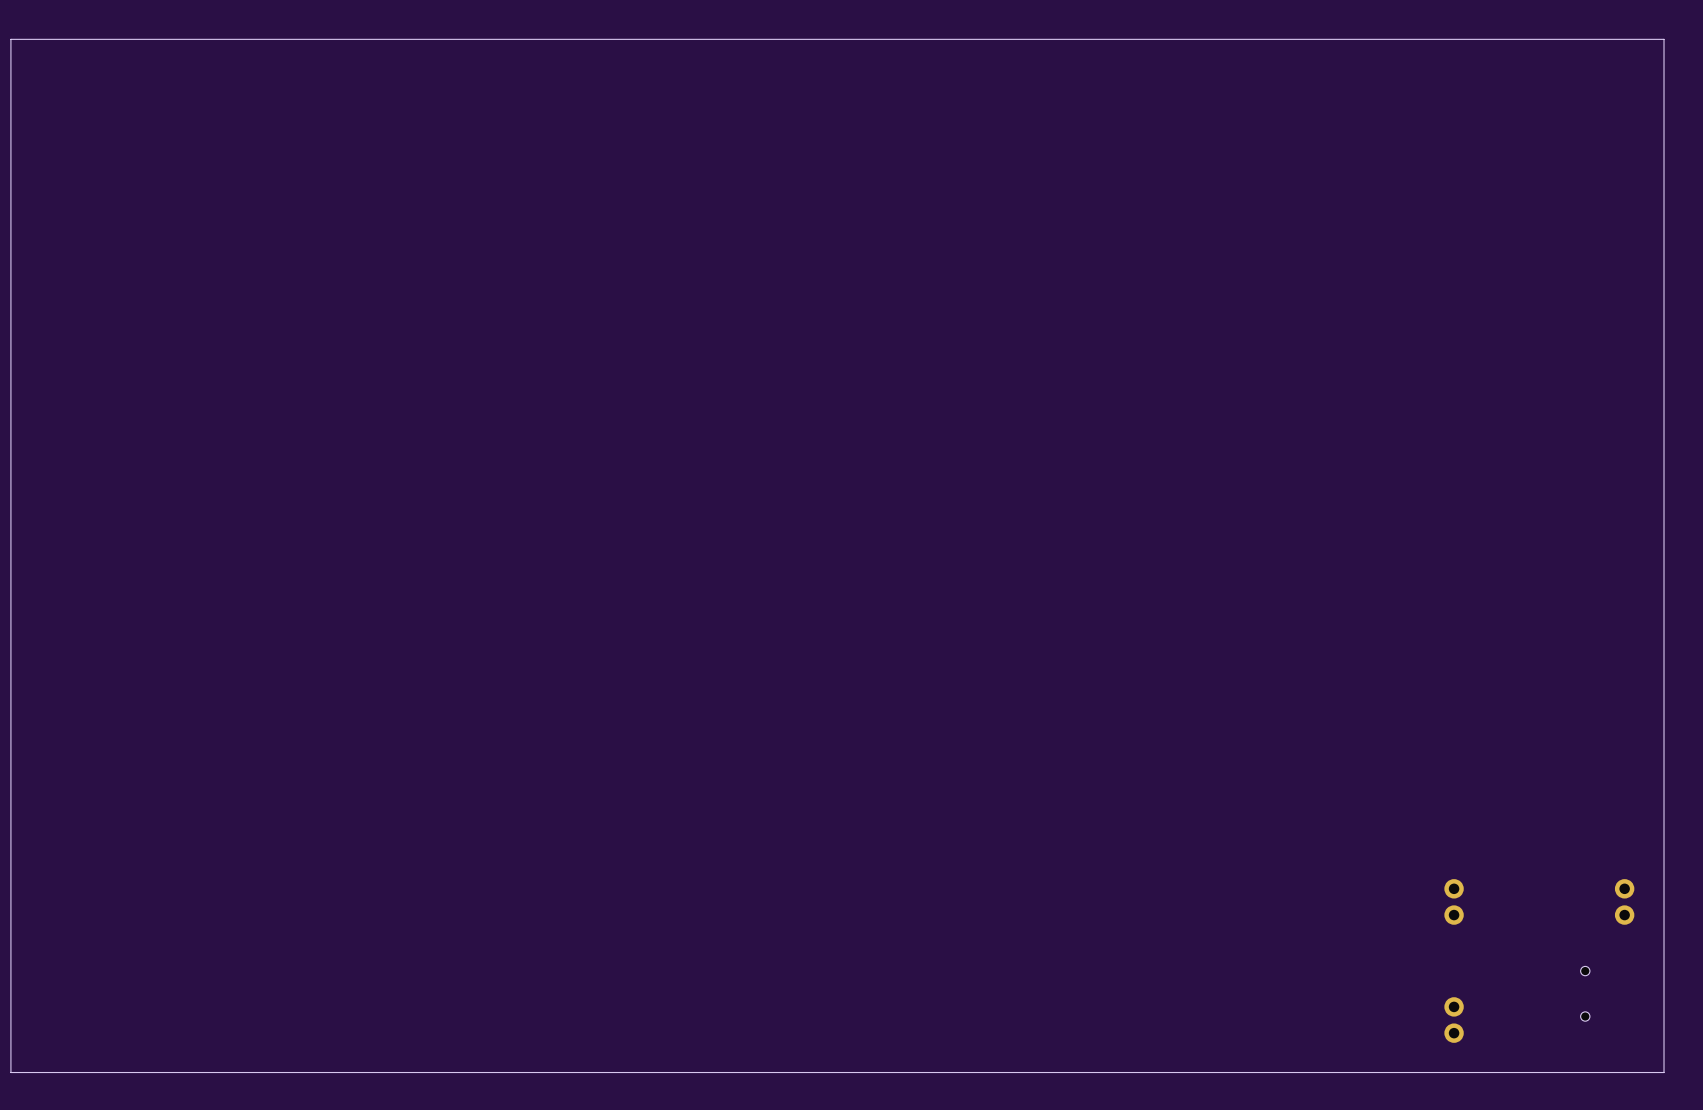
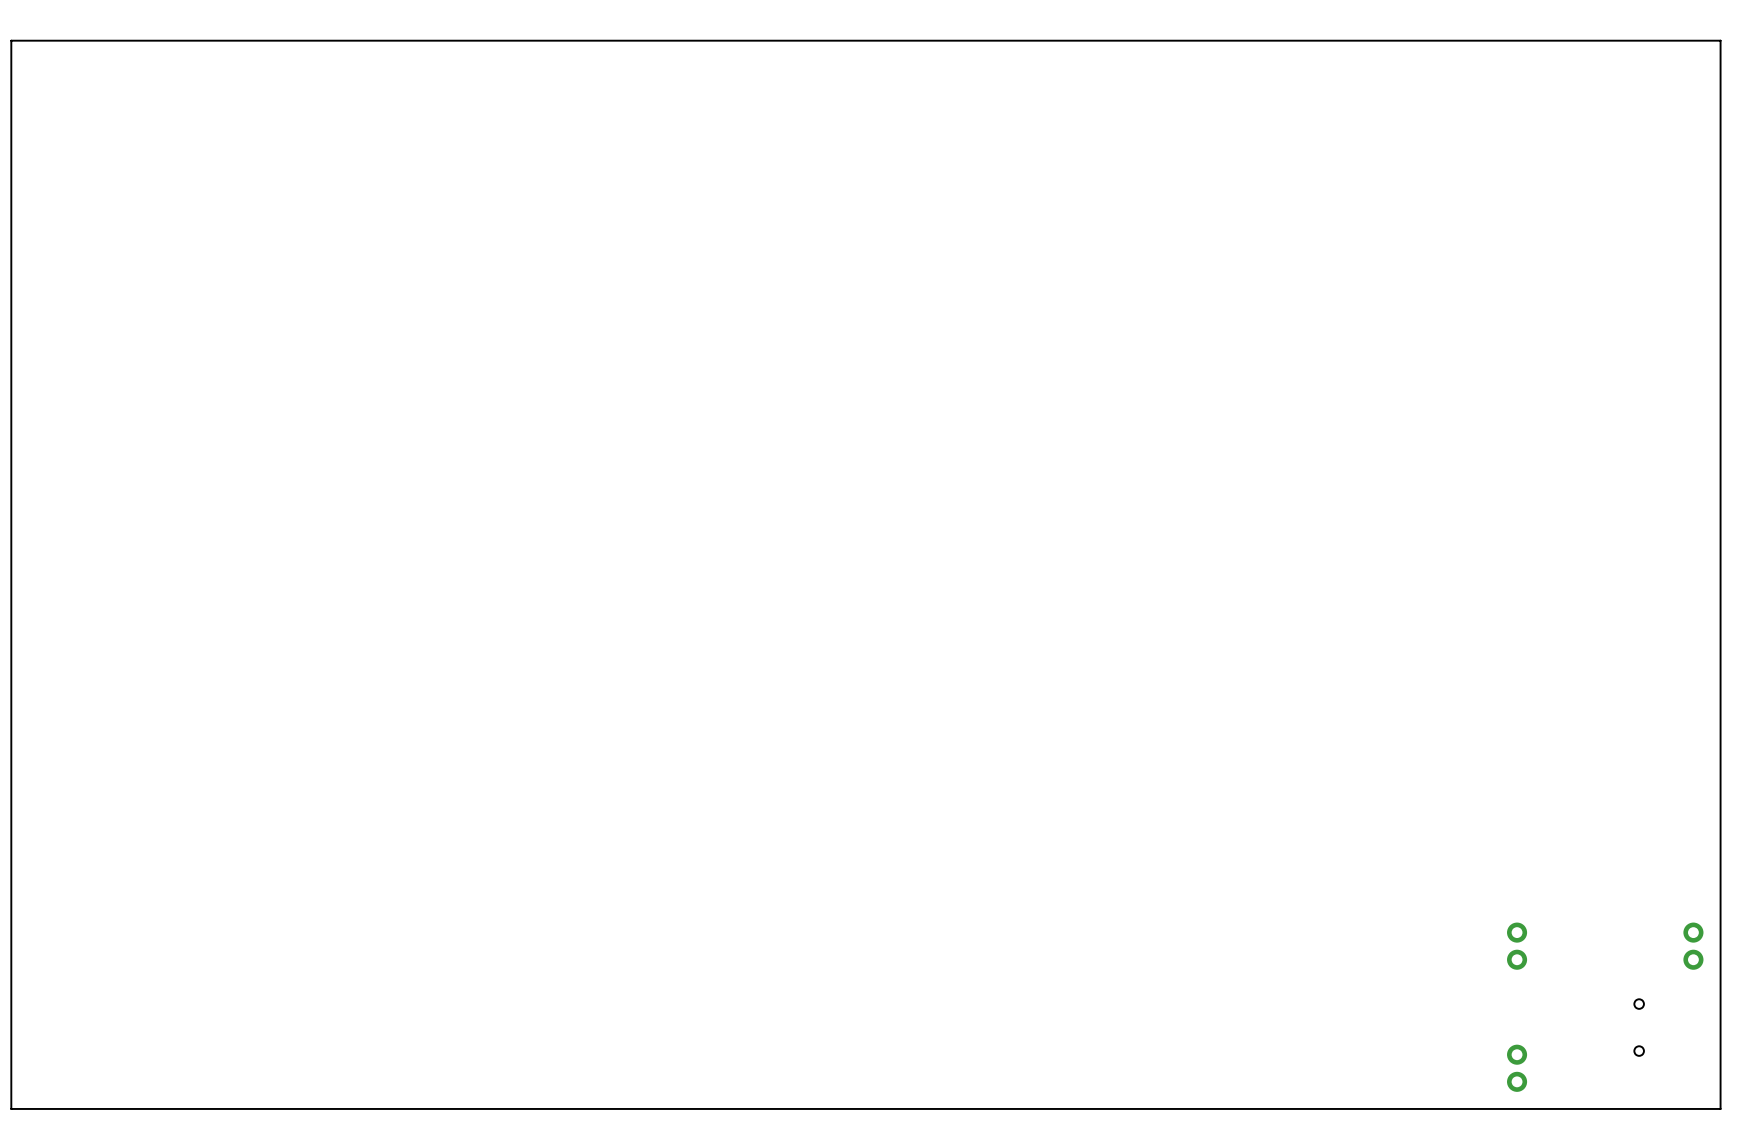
part position: (1454, 901) -> (1517, 946)
part position: (1624, 901) -> (1693, 946)
part position: (1454, 1020) -> (1517, 1068)

